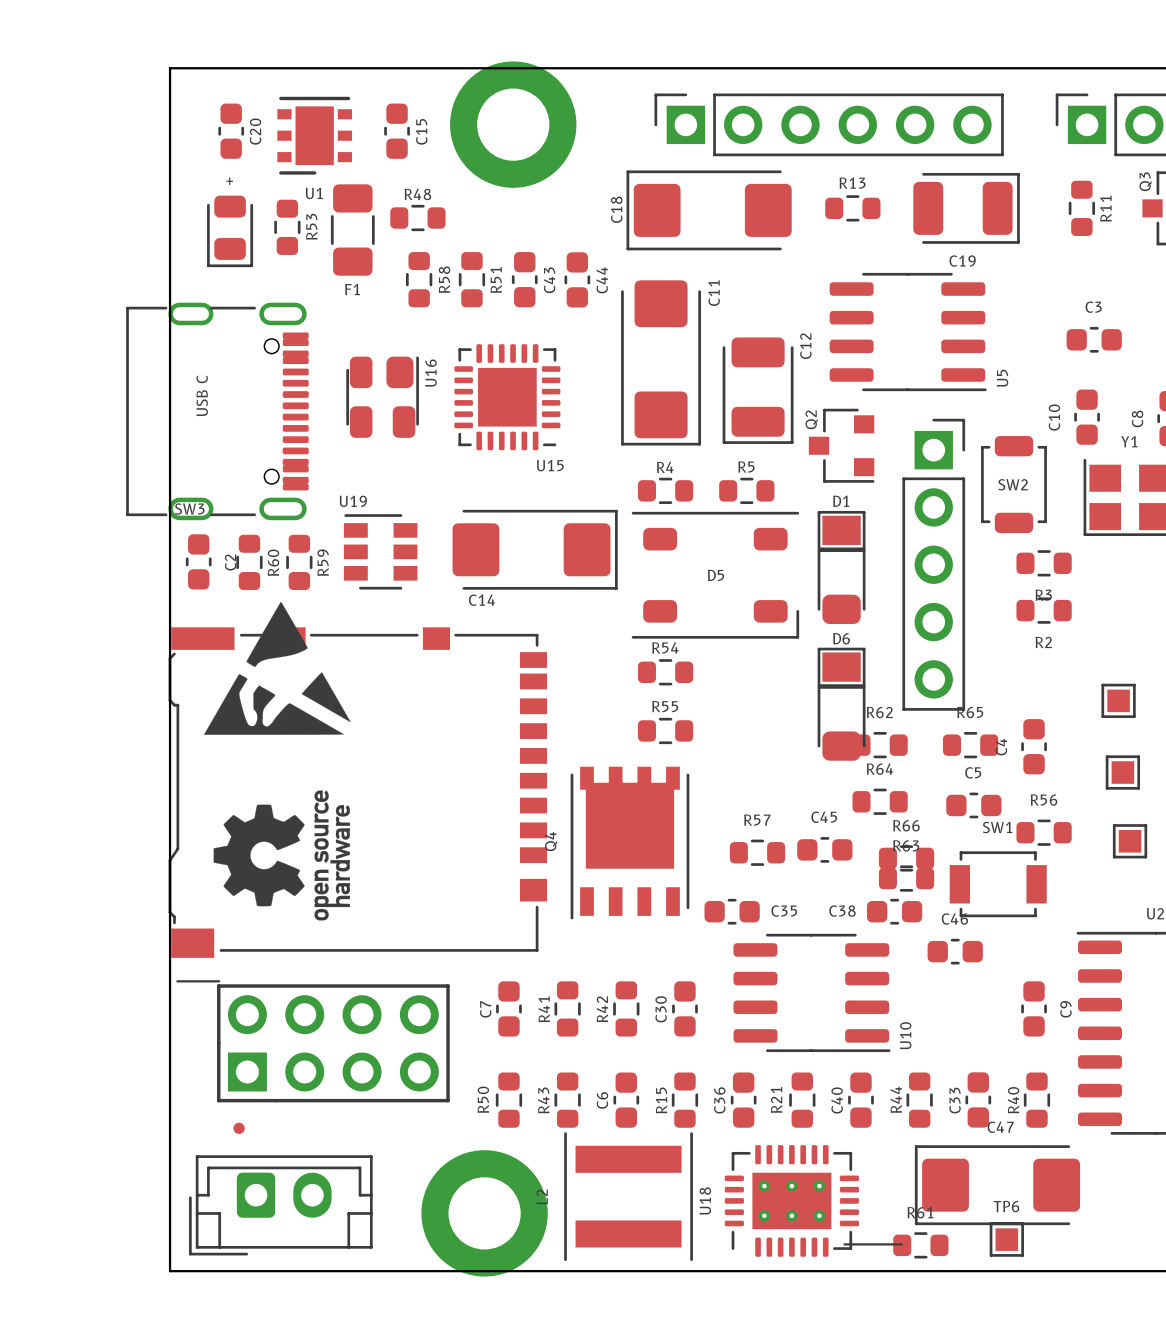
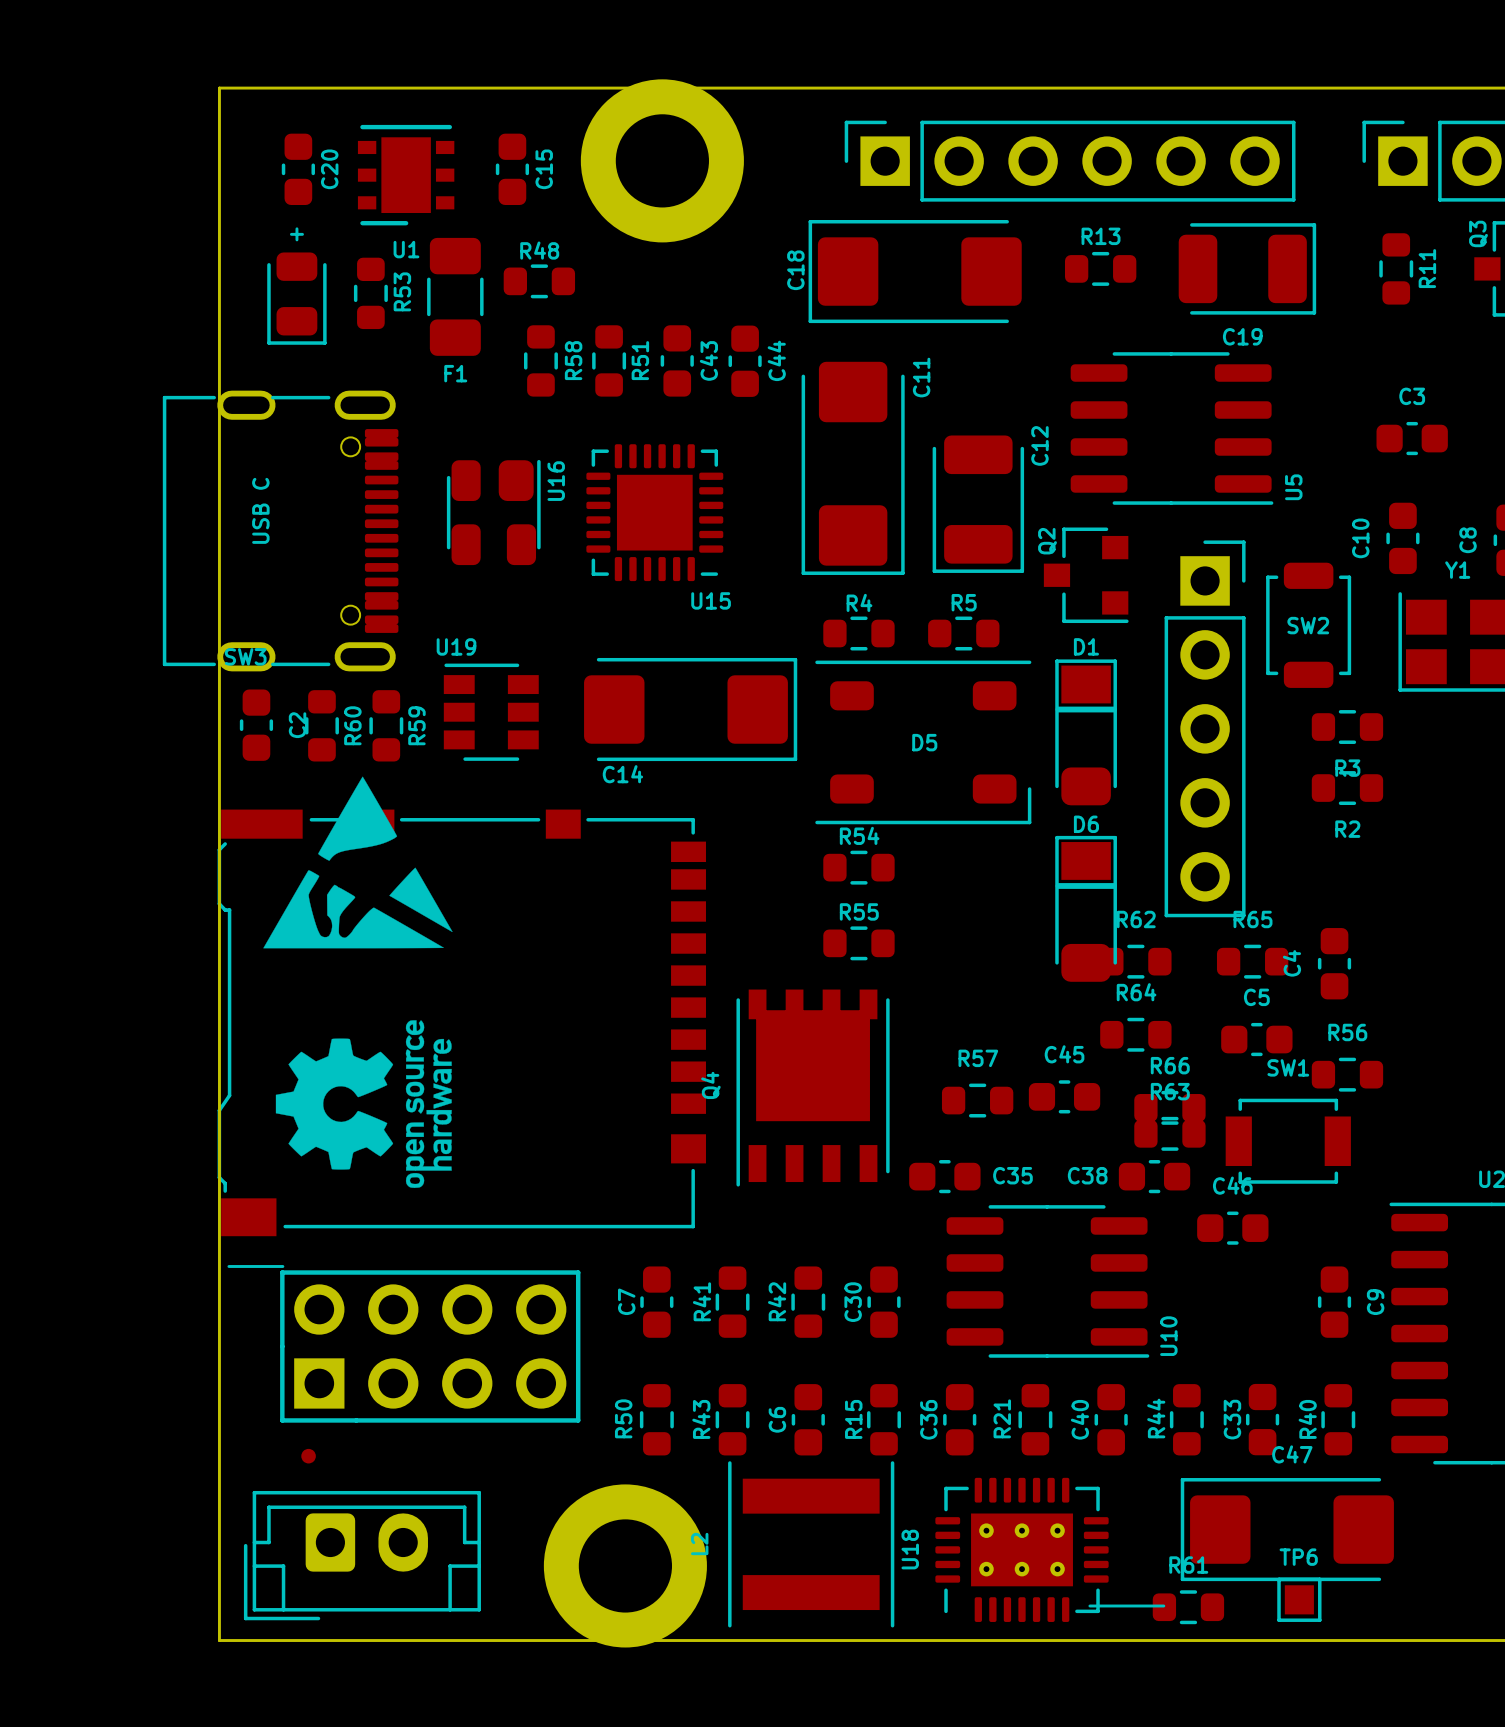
part: (1118, 700) -> none
part: (1122, 772) -> none
part: (1130, 841) -> none

